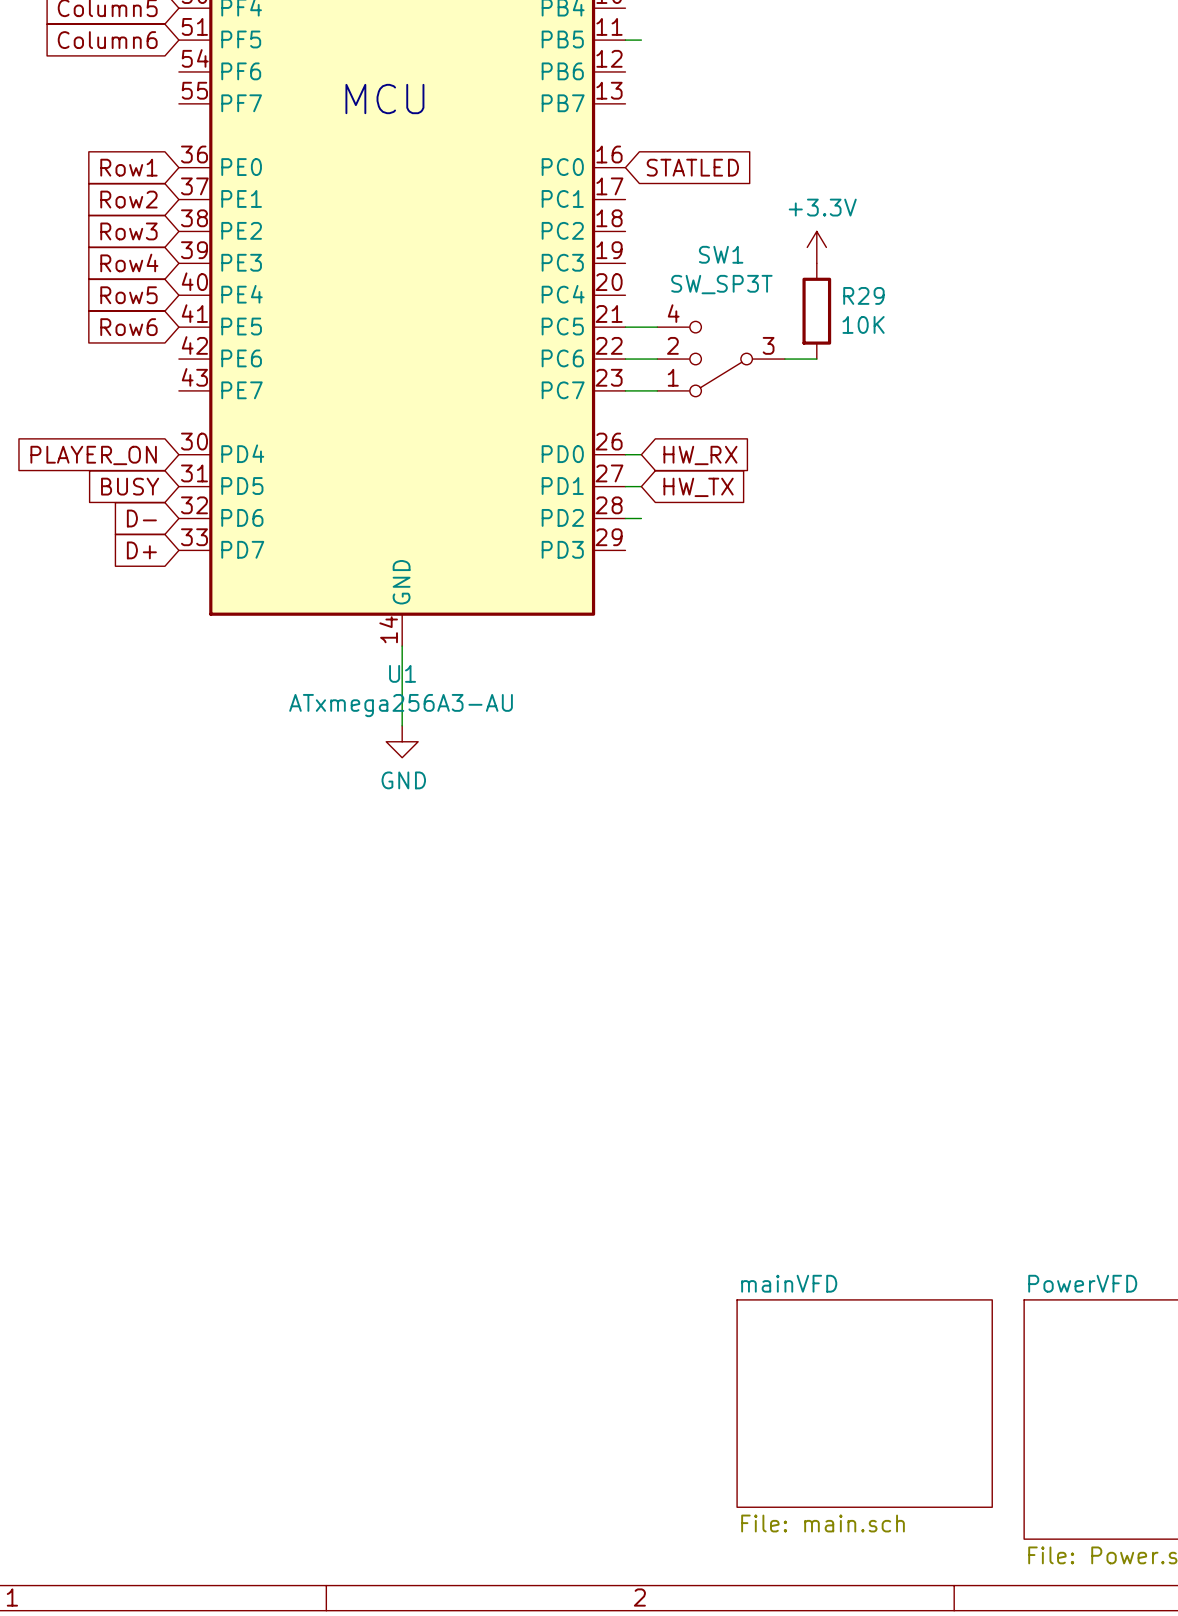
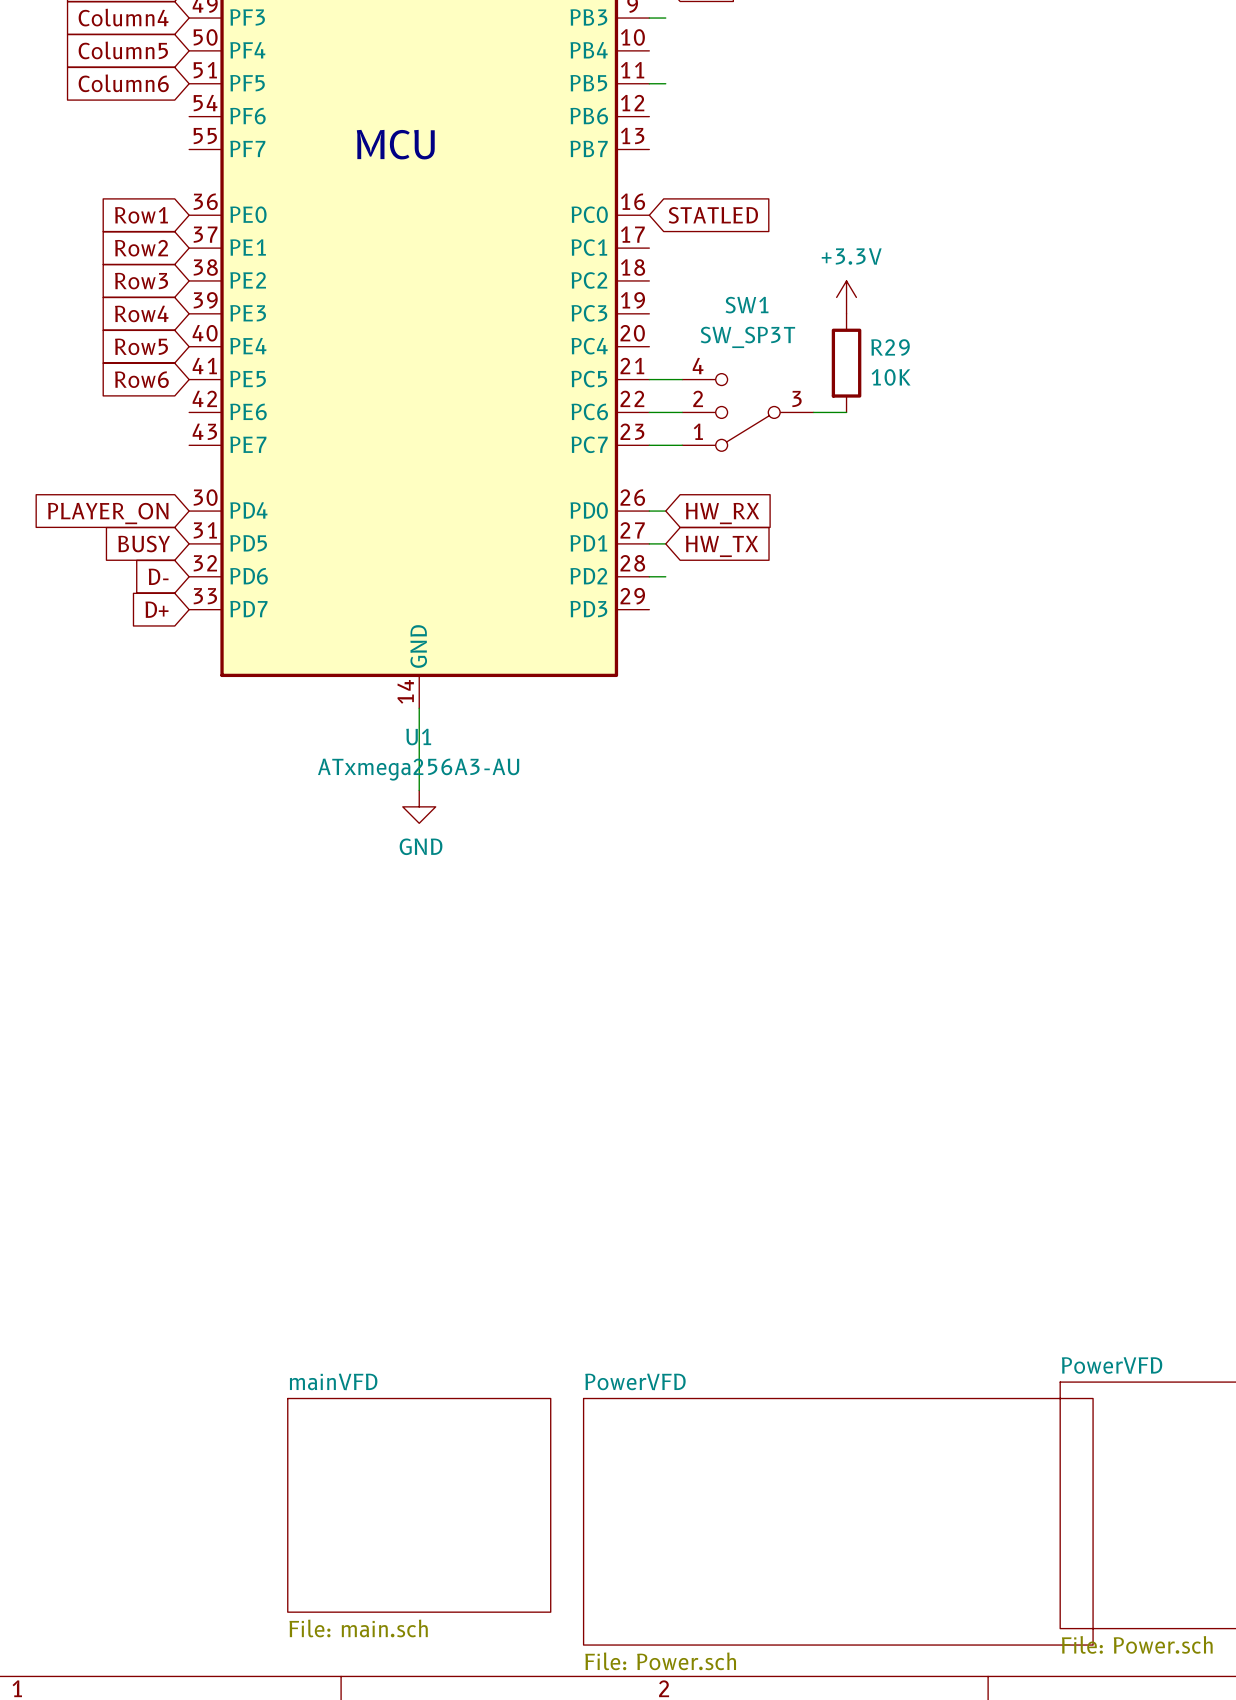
sheet mainVFD: File: main.sch (864, 1403) -> none
sheet mainVFD: none -> File: main.sch (419, 1505)
sheet PowerVFD: none -> File: Power.sch (838, 1521)

